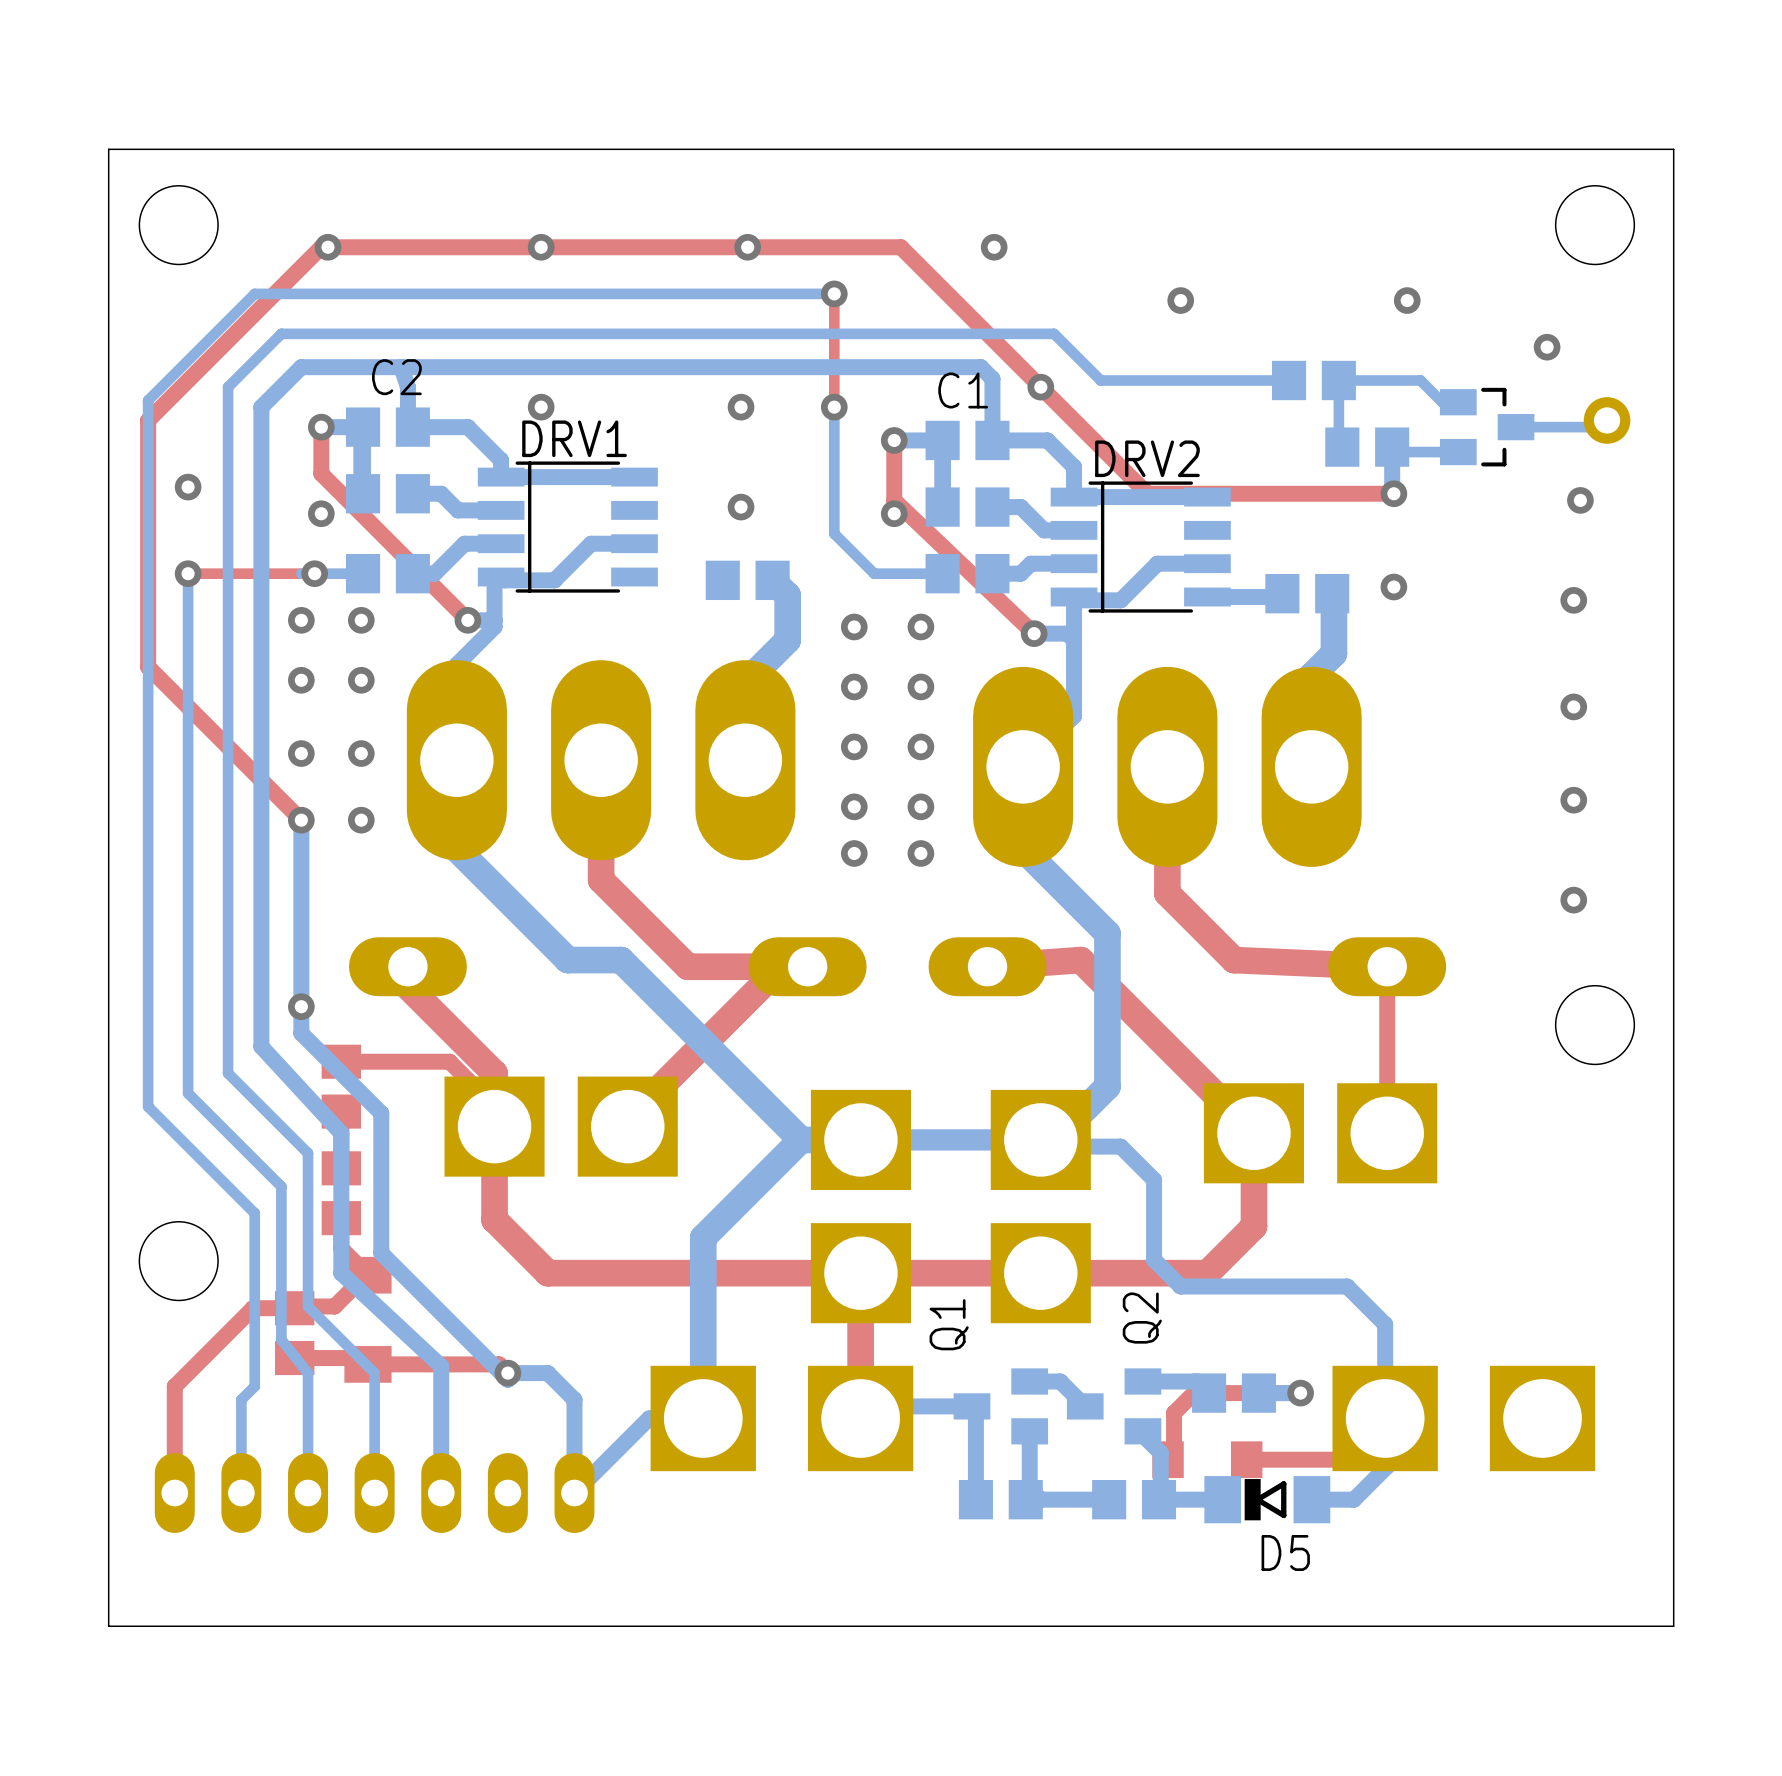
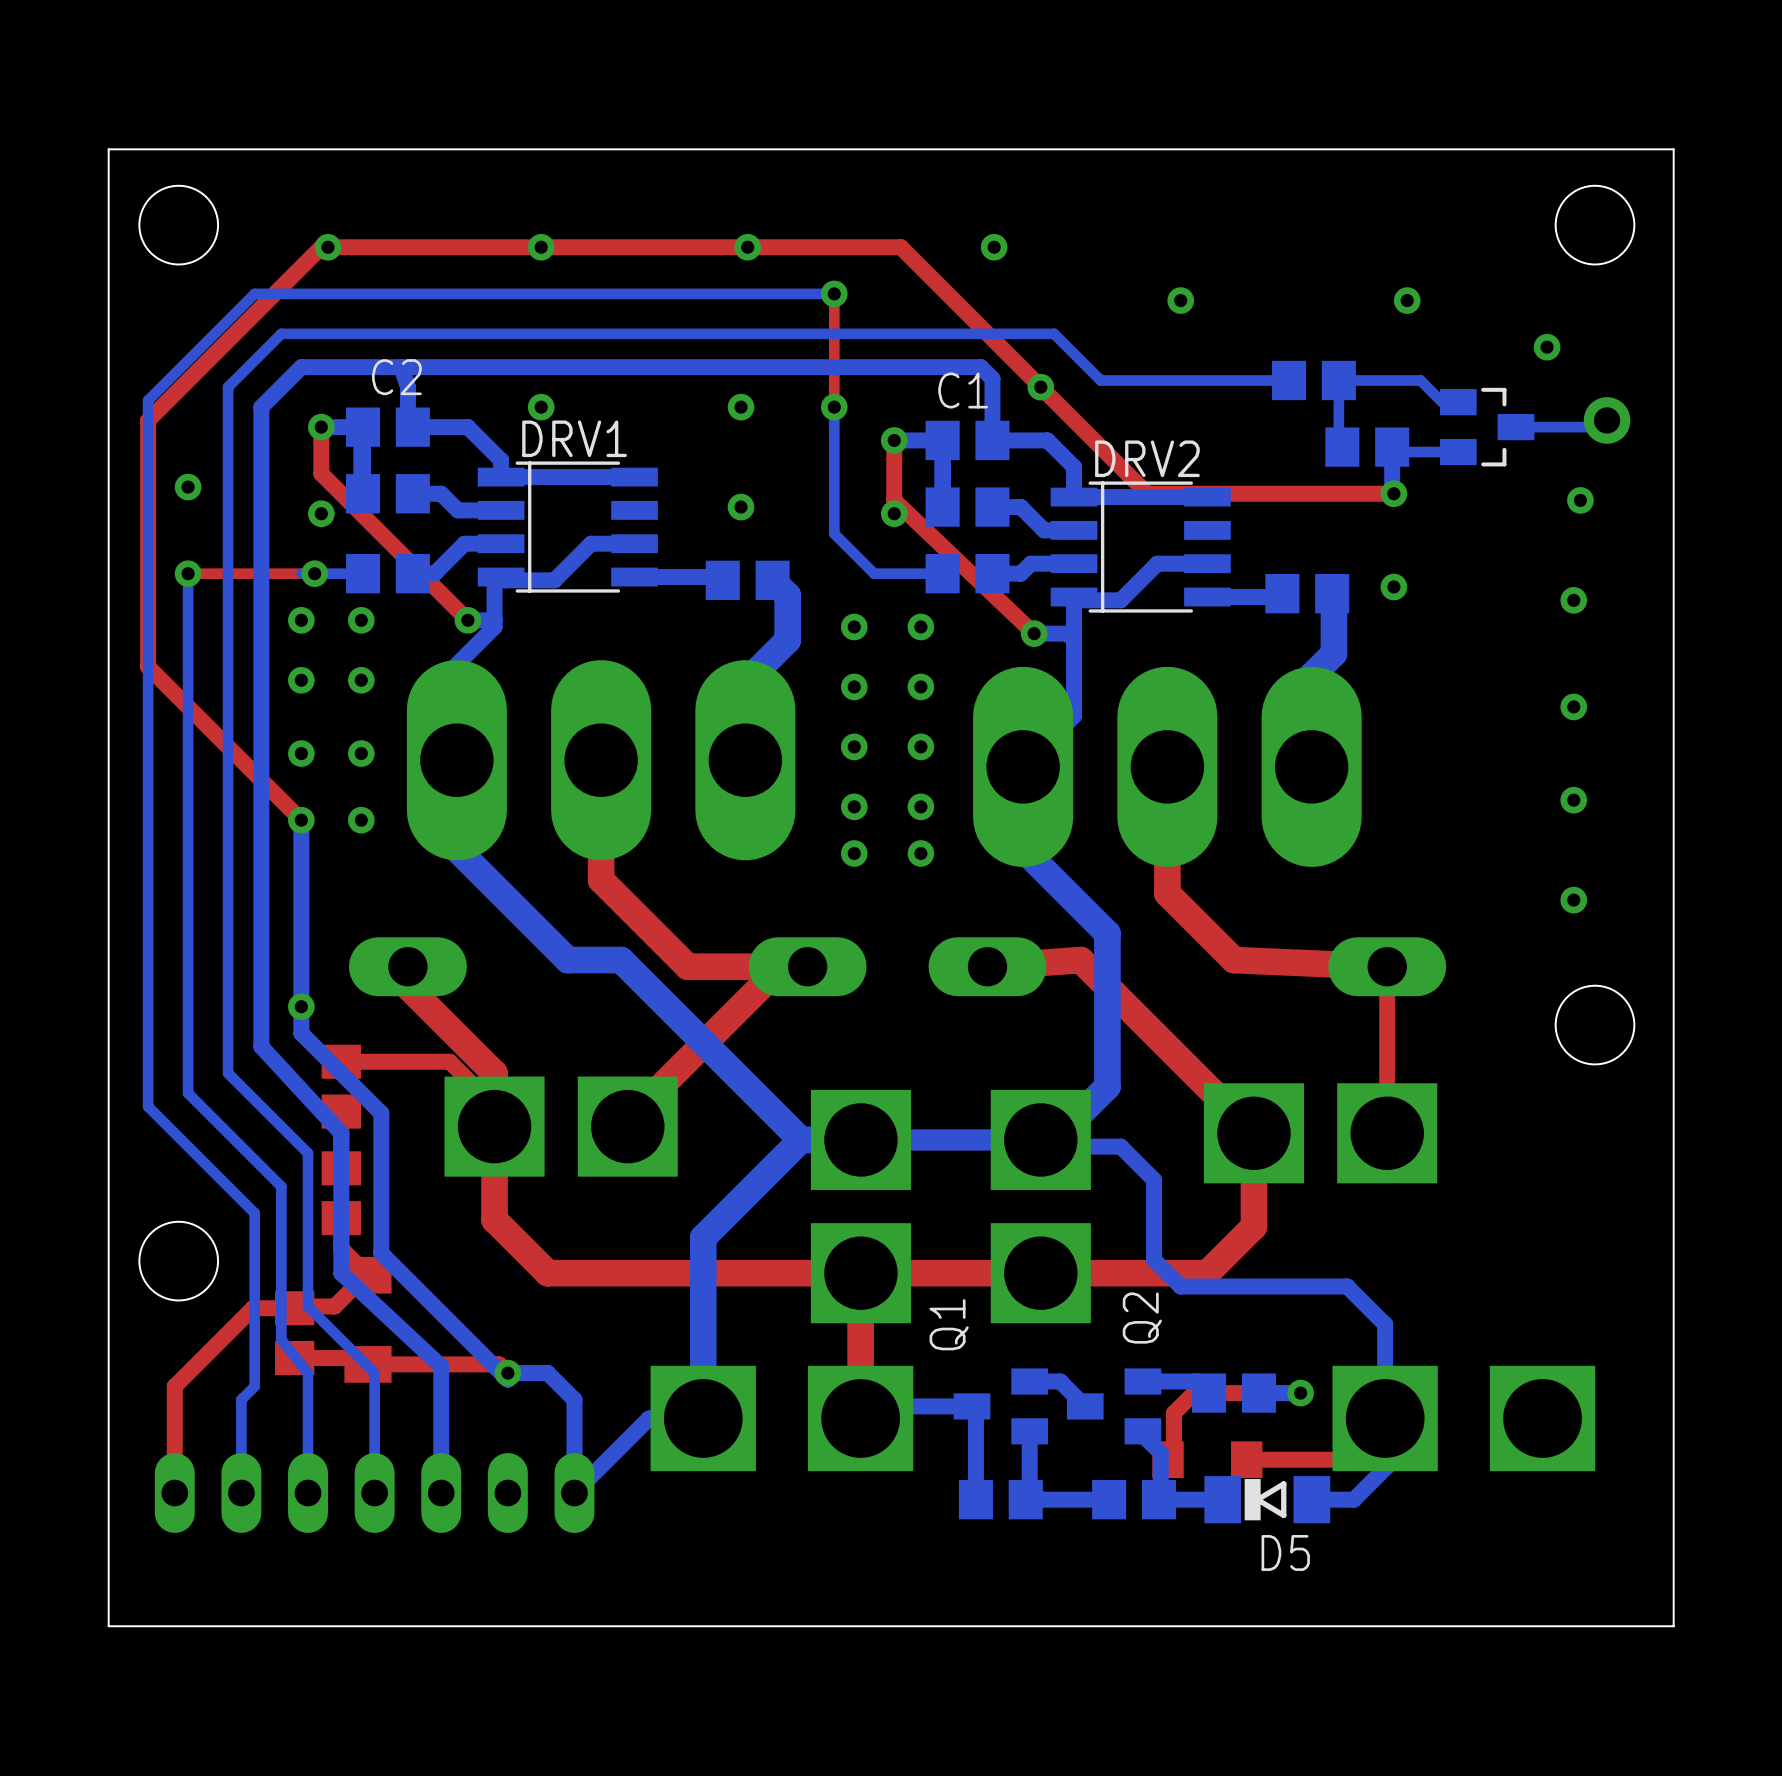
bottom track: none -> (634, 577) (722, 577) (722, 580)

